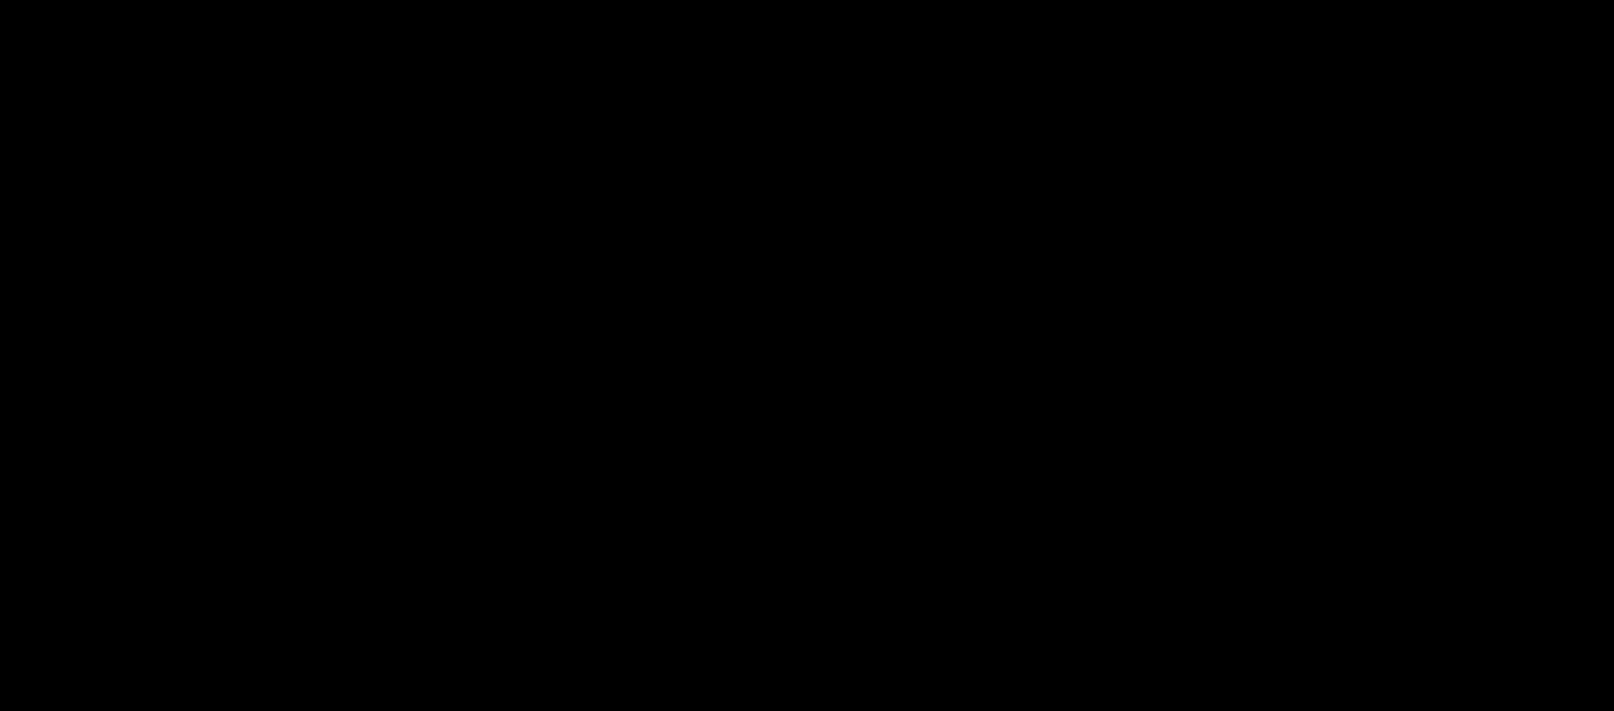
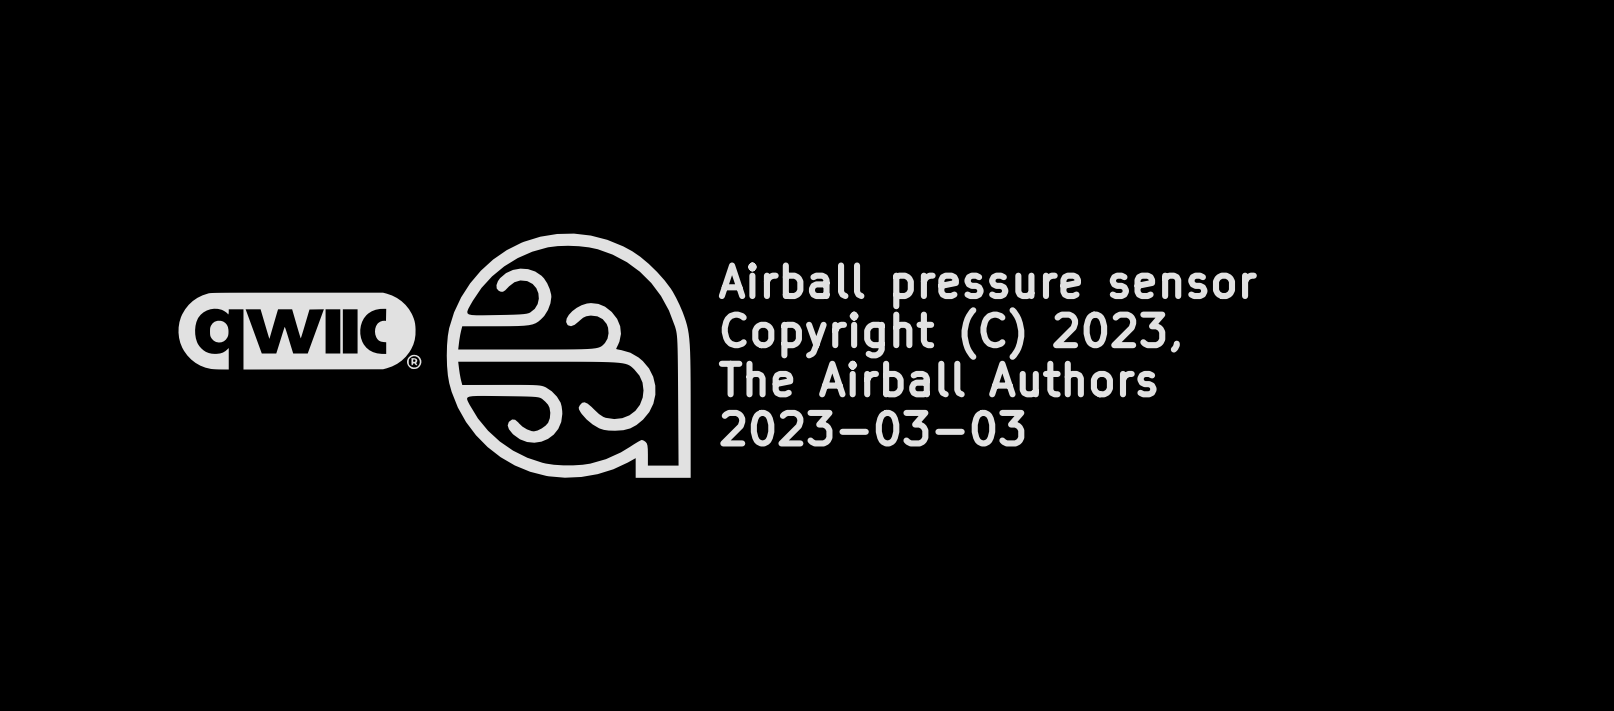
drawing: none -> [178, 233, 691, 478]
text: none -> Airball pressure sensor (987, 285)
text: none -> Copyright (C) 2023, (950, 333)
text: none -> The Airball Authors (937, 379)
text: none -> 2023-03-03 (872, 428)

